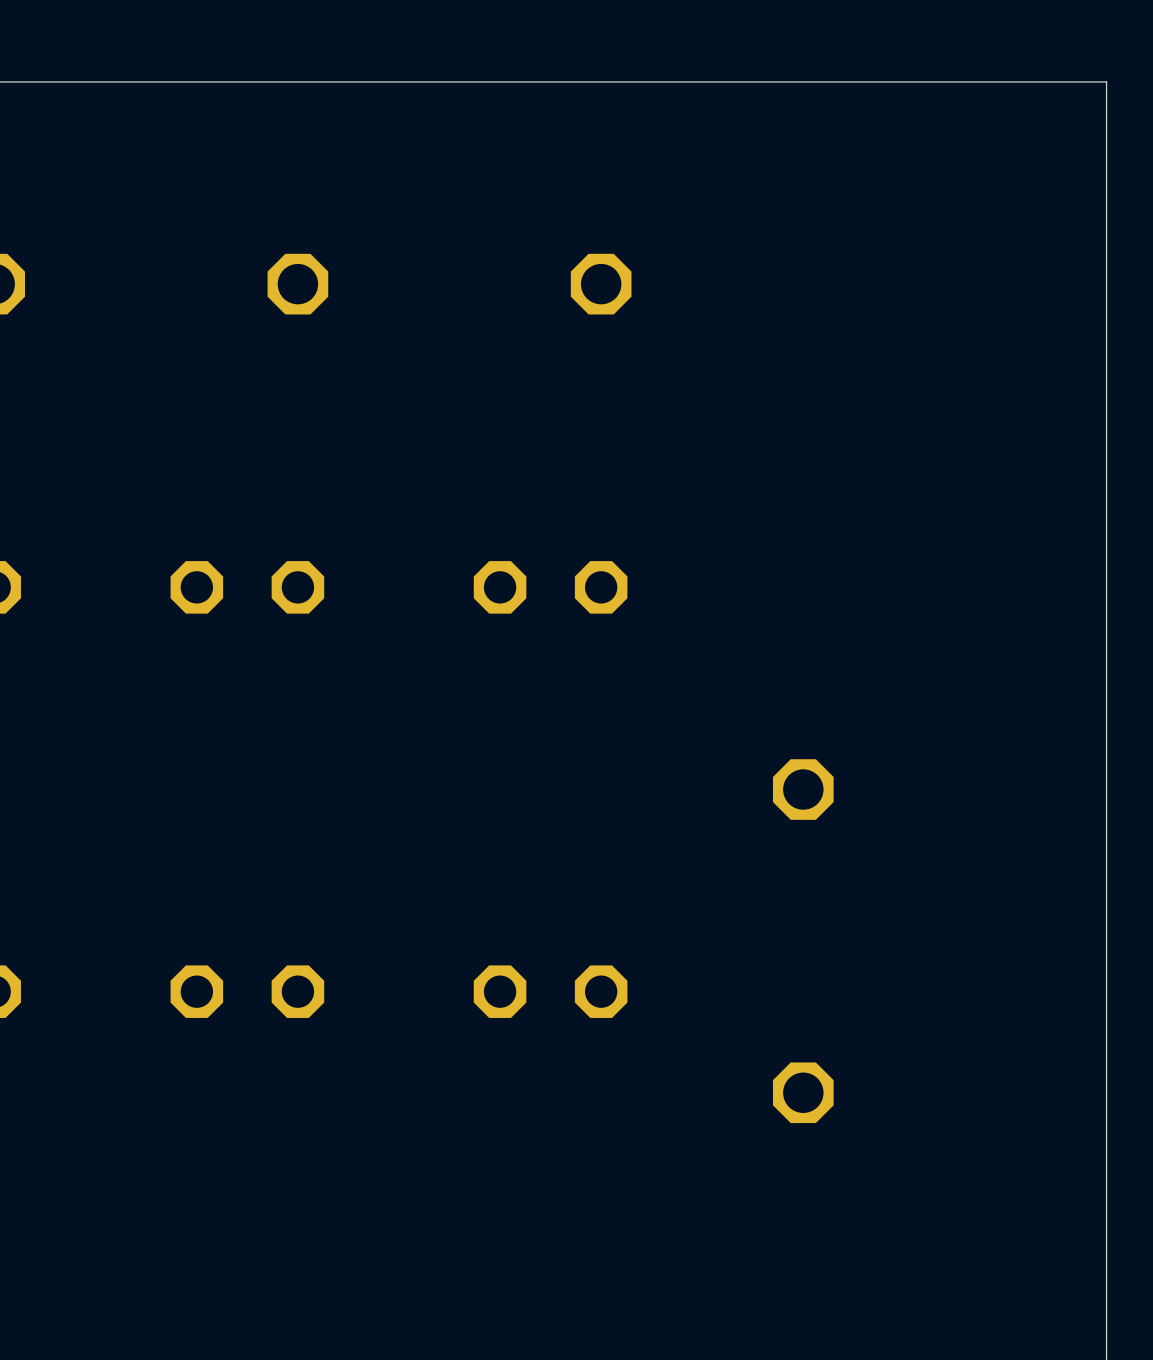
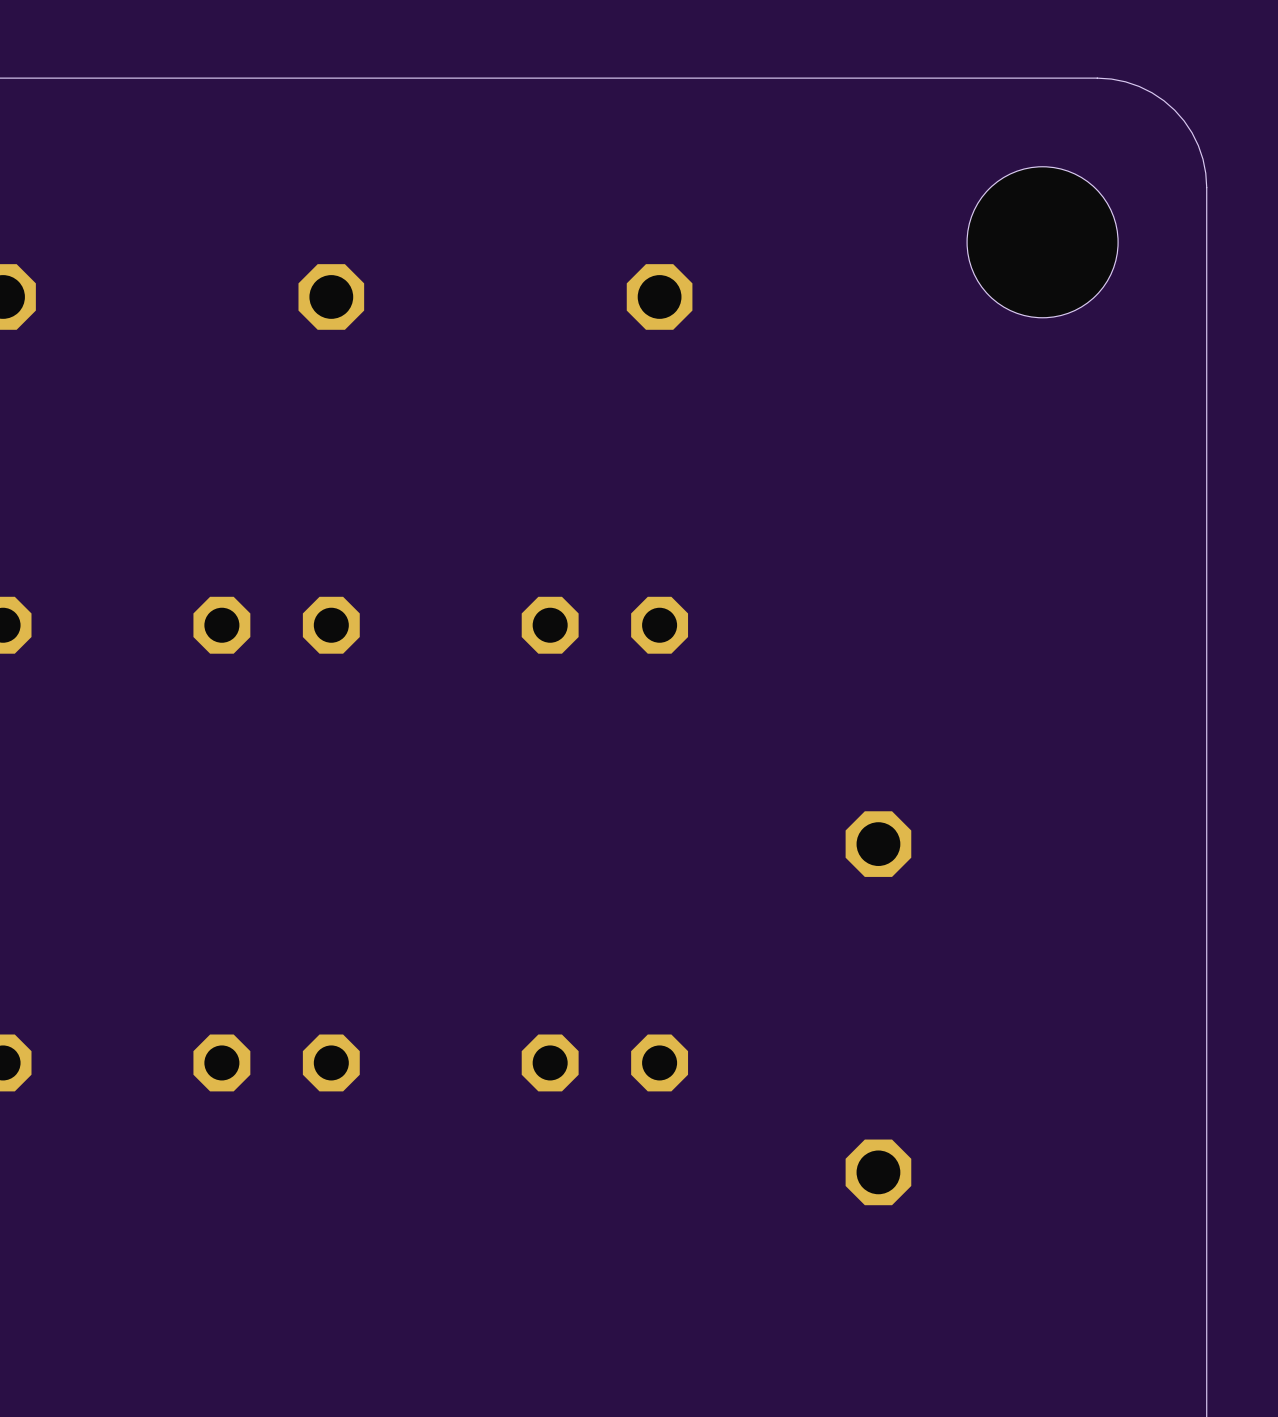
board edge: (1005, 81) (1106, 81) (1106, 183) -> (1097, 78) (1125, 81) (1139, 86) (1163, 100) (1174, 110) (1184, 120) (1198, 145) (1202, 159) (1206, 187)
hole: none -> (1042, 242)

